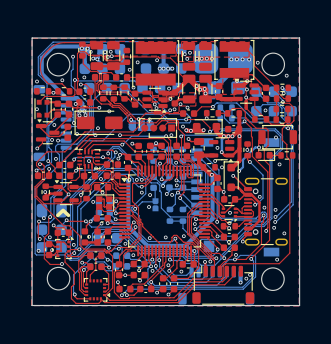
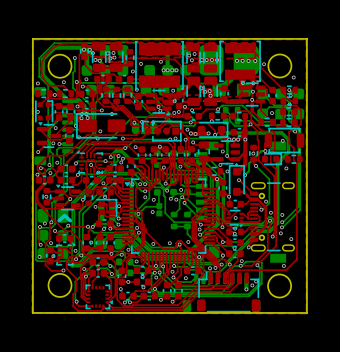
via: (176, 180) -> none

